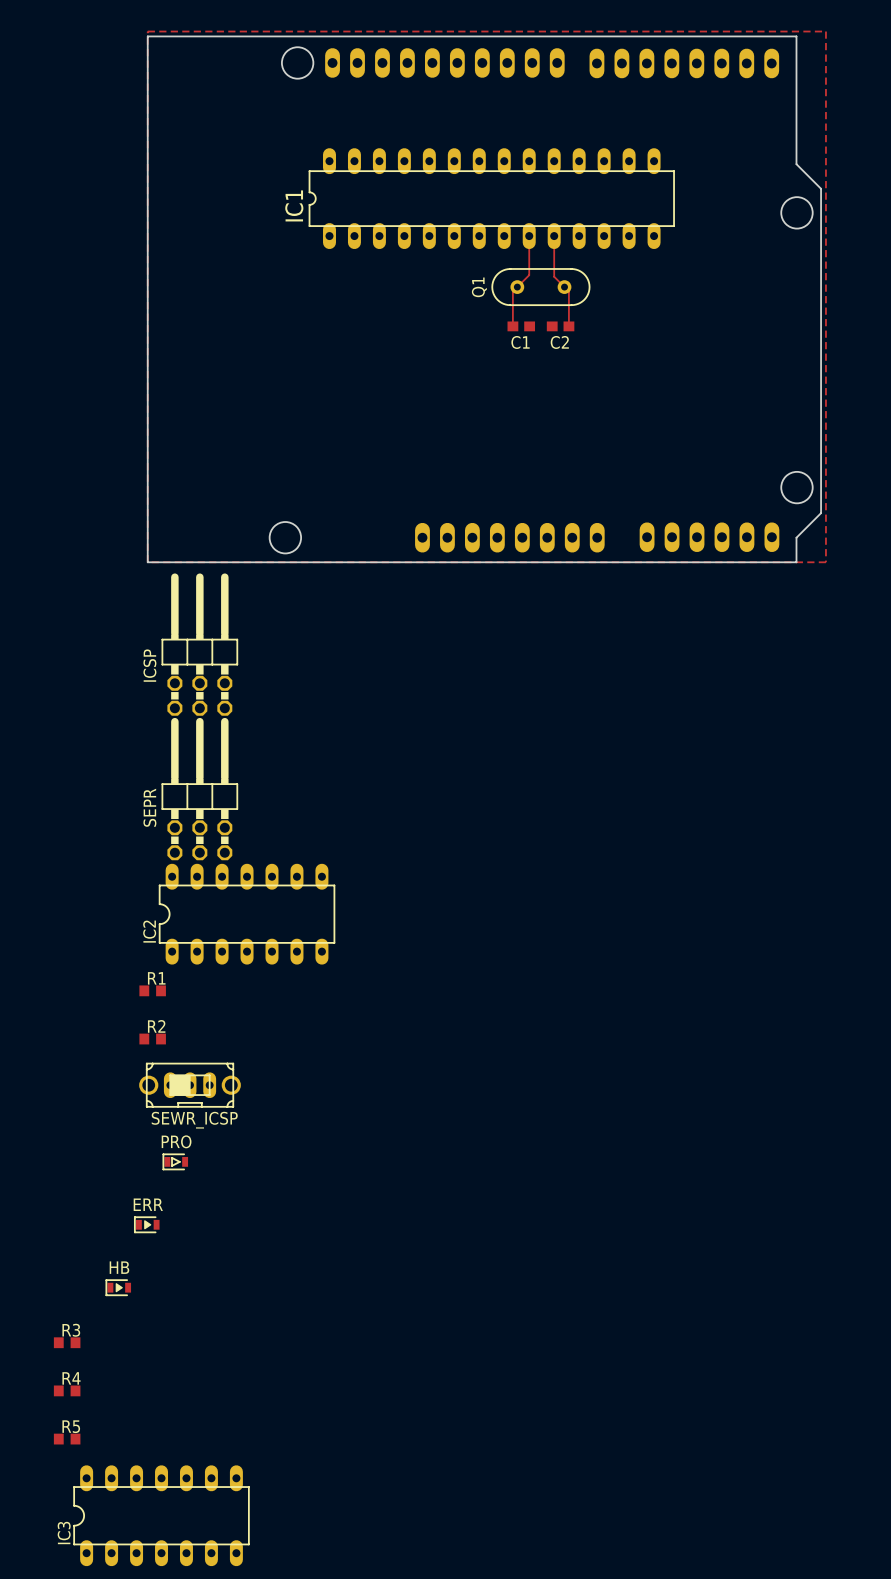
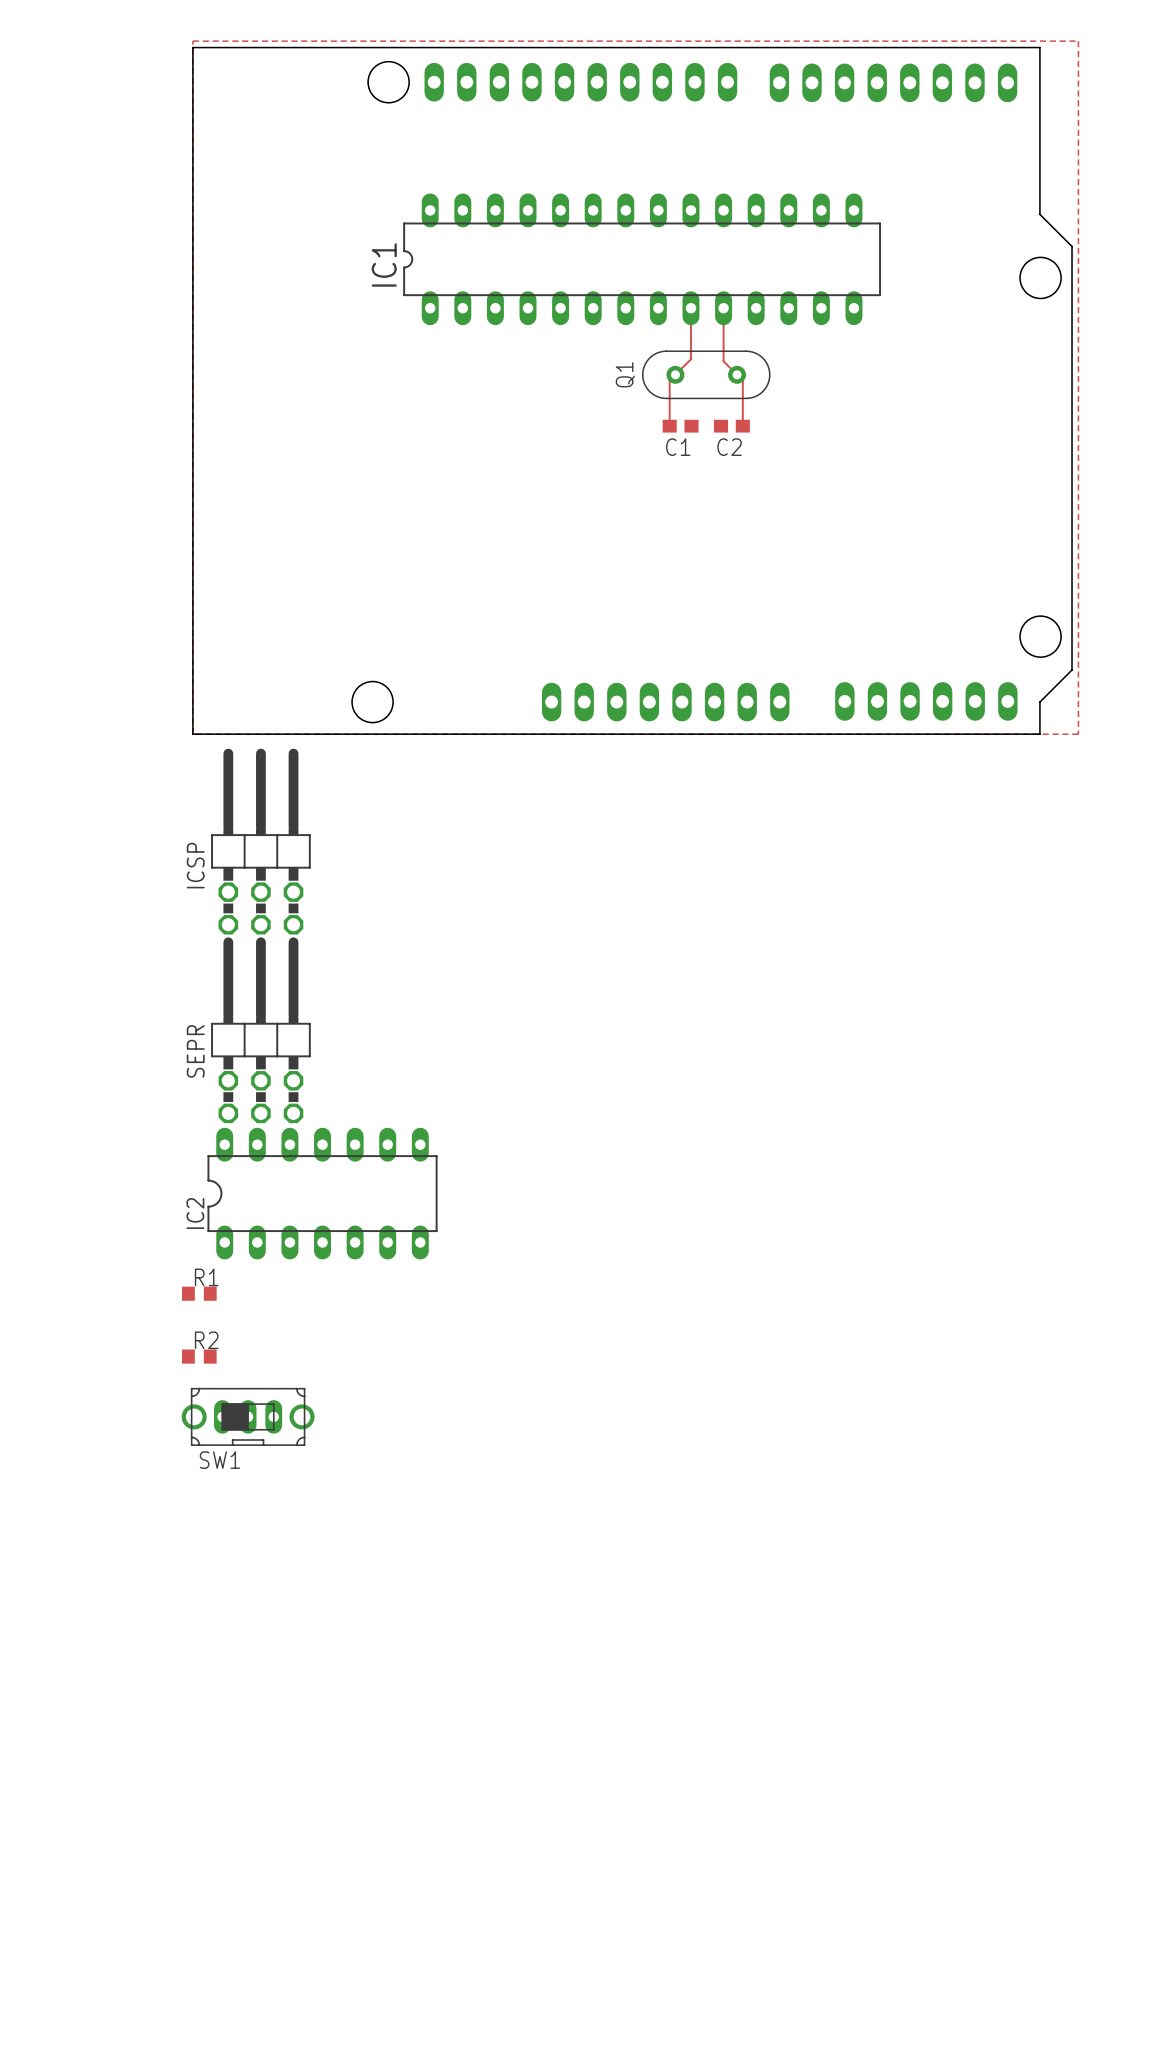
SEWR_ICSP name: SEWR_ICSP (194, 1120) -> SW1 (219, 1460)
PRO: (175, 1161) -> none
ERR: (146, 1224) -> none
HB: (118, 1287) -> none
R3: (67, 1342) -> none
R4: (67, 1390) -> none
R5: (67, 1439) -> none
IC3: (161, 1515) -> none

